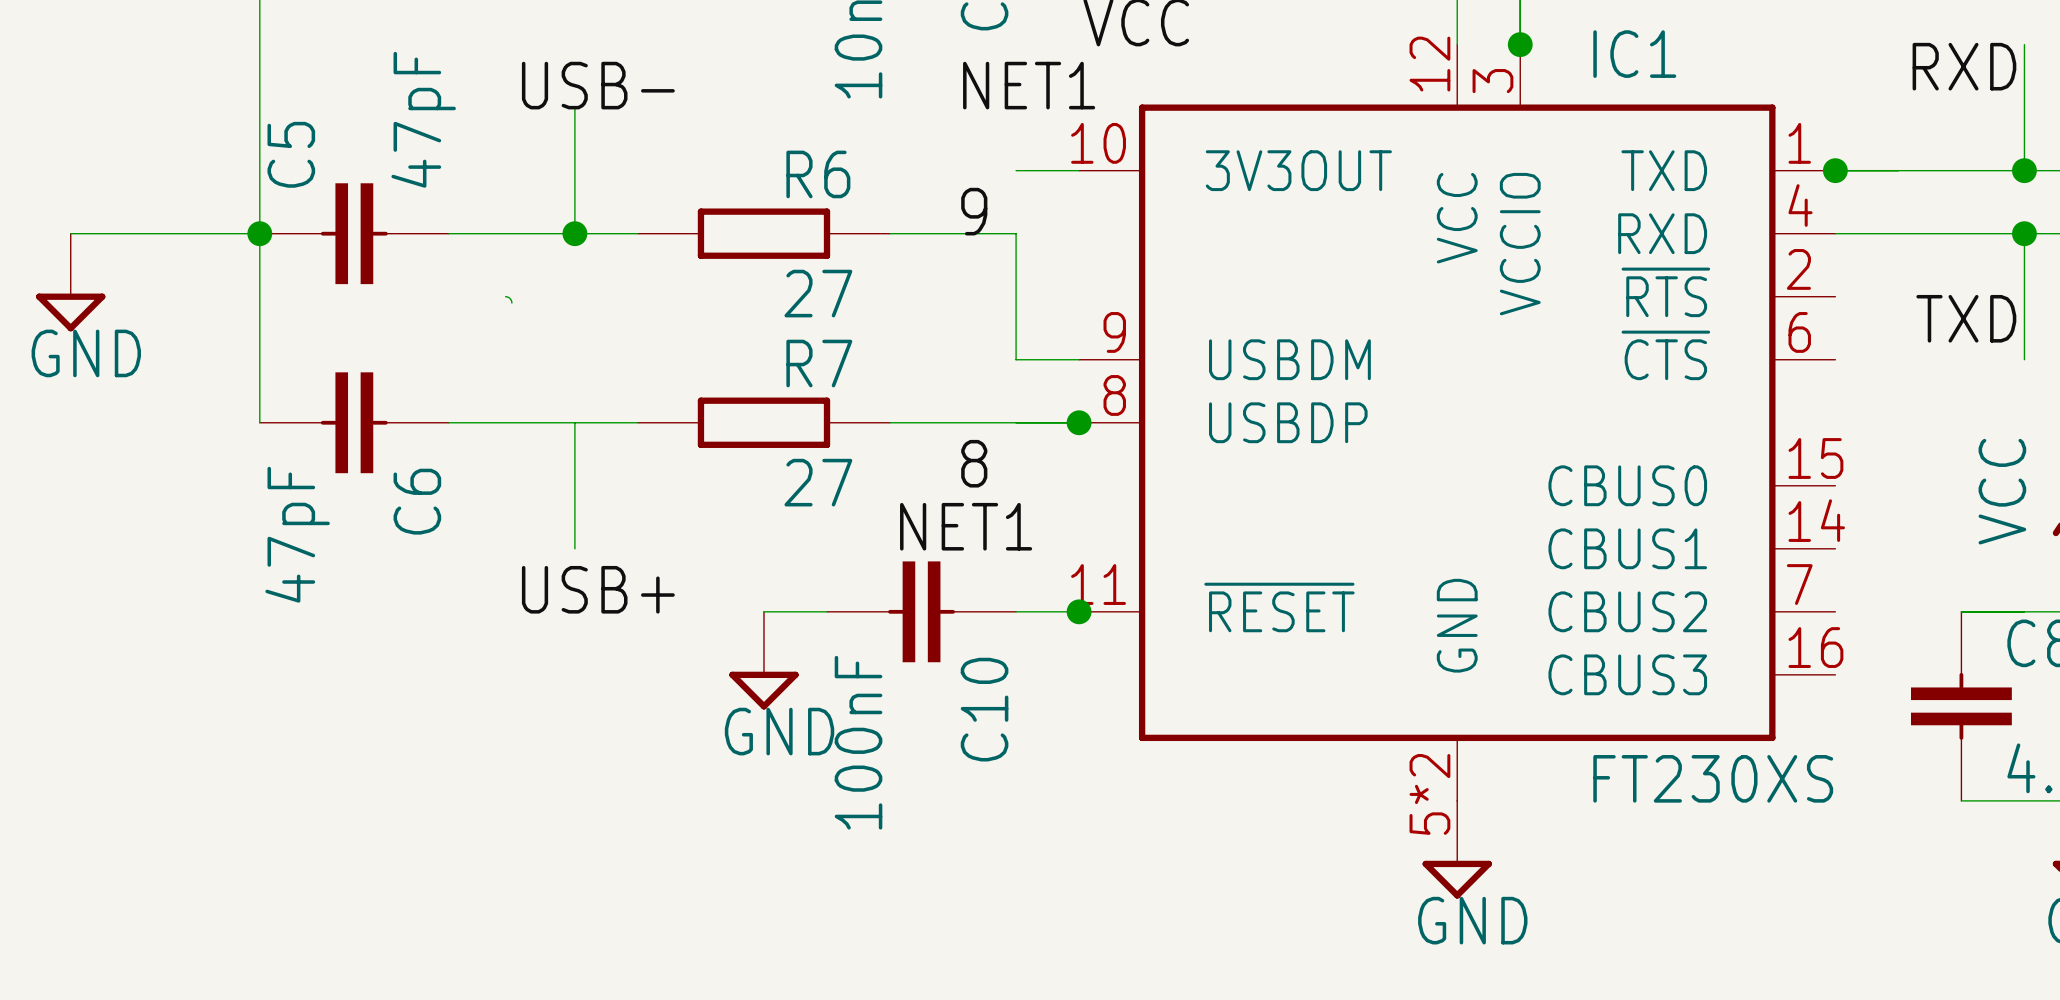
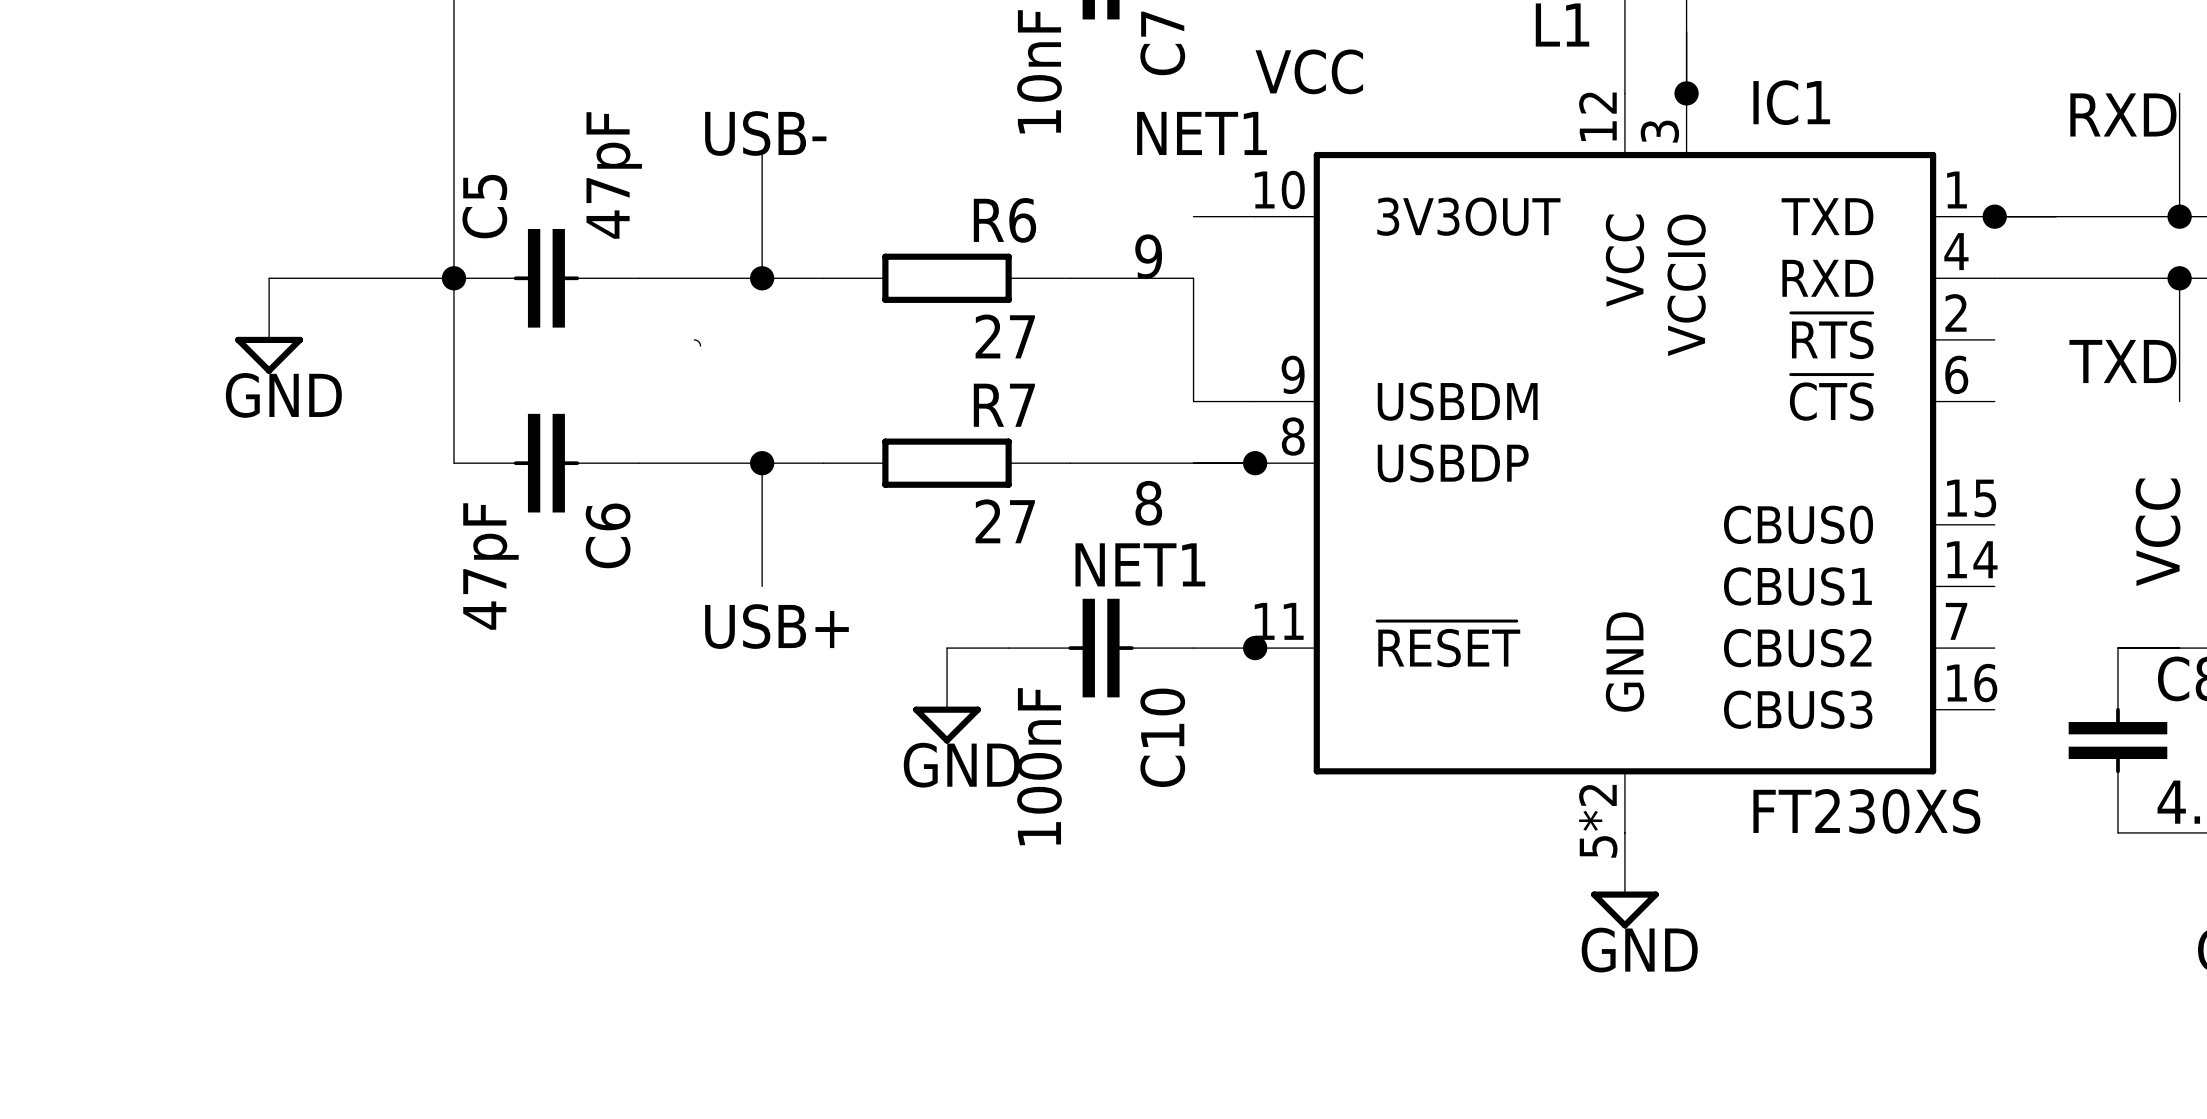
junction: none -> (762, 463)

